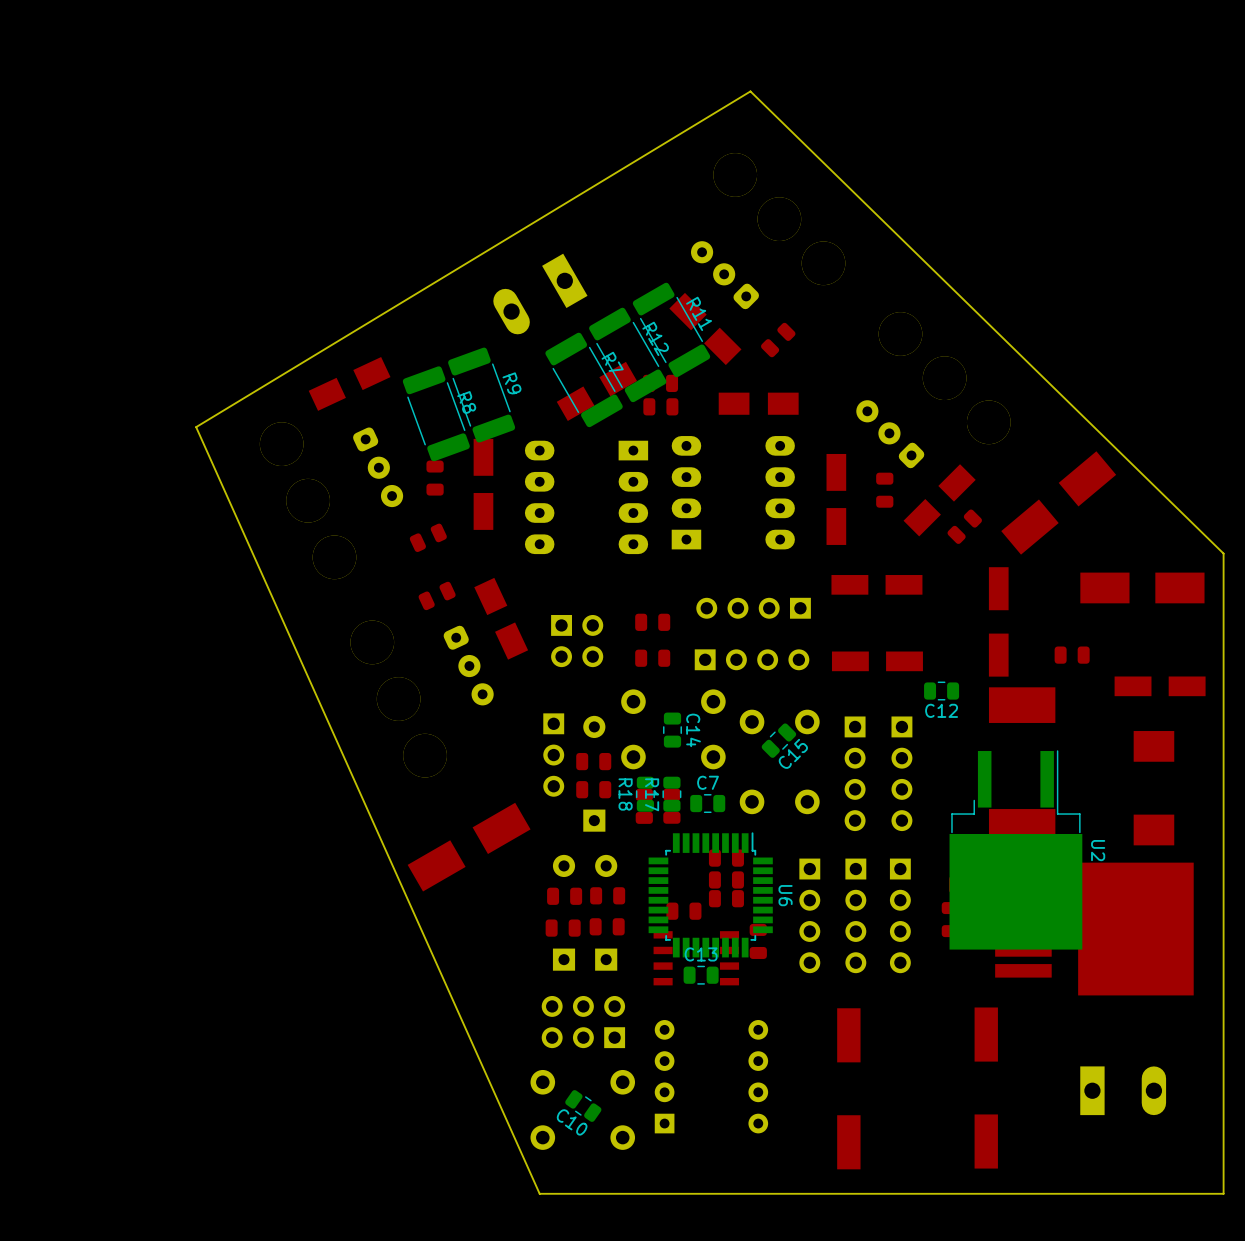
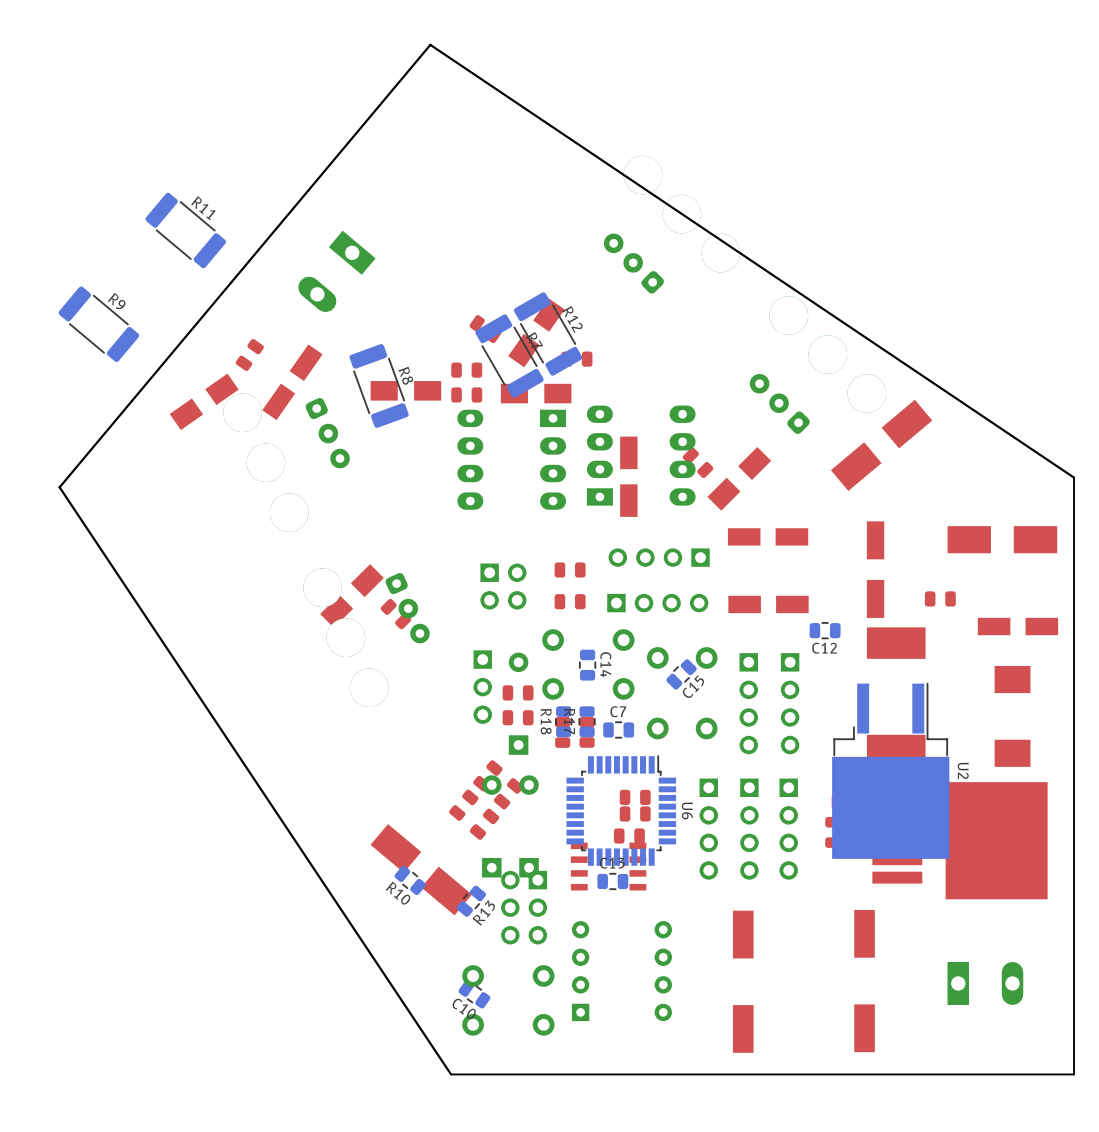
part: none -> (336, 271)
part: (540, 293) -> none
part: (705, 328) -> none
R11 rotation: 0° (671, 329) -> 20° counterclockwise (185, 230)
R11 position: (671, 329) -> (185, 230)
part: (778, 340) -> none
part: none -> (485, 329)
part: none -> (536, 332)
part: none -> (249, 354)
part: (349, 383) -> none
part: (596, 391) -> none
R9 rotation: 0° (481, 395) -> 30° counterclockwise (98, 324)
R9 position: (481, 395) -> (98, 324)
part: none -> (466, 370)
part position: (758, 403) -> (536, 393)
part: (660, 406) -> none
part: none -> (292, 382)
part: none -> (405, 390)
part: none -> (466, 394)
part: none -> (204, 401)
part: (435, 478) -> none
part: (483, 484) -> none
part: (884, 490) -> none
part position: (836, 499) -> (628, 476)
part: none -> (698, 462)
part position: (939, 500) -> (739, 478)
part position: (1058, 502) -> (881, 445)
part: (964, 526) -> none
part: (428, 537) -> none
board edge: (1223, 553) (750, 91) (196, 427) (539, 1193) -> (1074, 509) (1074, 477) (430, 44) (59, 487) (451, 1074) (470, 1074)
part: (437, 595) -> none
part: (501, 618) -> none
part: none -> (352, 596)
part: none -> (395, 614)
part: (469, 847) -> none
part: none -> (487, 775)
part: (726, 858) -> none
part: none -> (508, 793)
part: none -> (463, 805)
part: (607, 895) -> none
part: (564, 896) -> none
part: none -> (484, 824)
R10 side: top (683, 911) -> bottom (410, 880)
part: none -> (629, 836)
part: (607, 926) -> none
part: (563, 928) -> none
R13 side: top (758, 941) -> bottom (471, 901)
part: none -> (421, 869)
part rotation: 0° (583, 1022) -> 90° counterclockwise (524, 907)
C10 position: (583, 1106) -> (474, 994)

